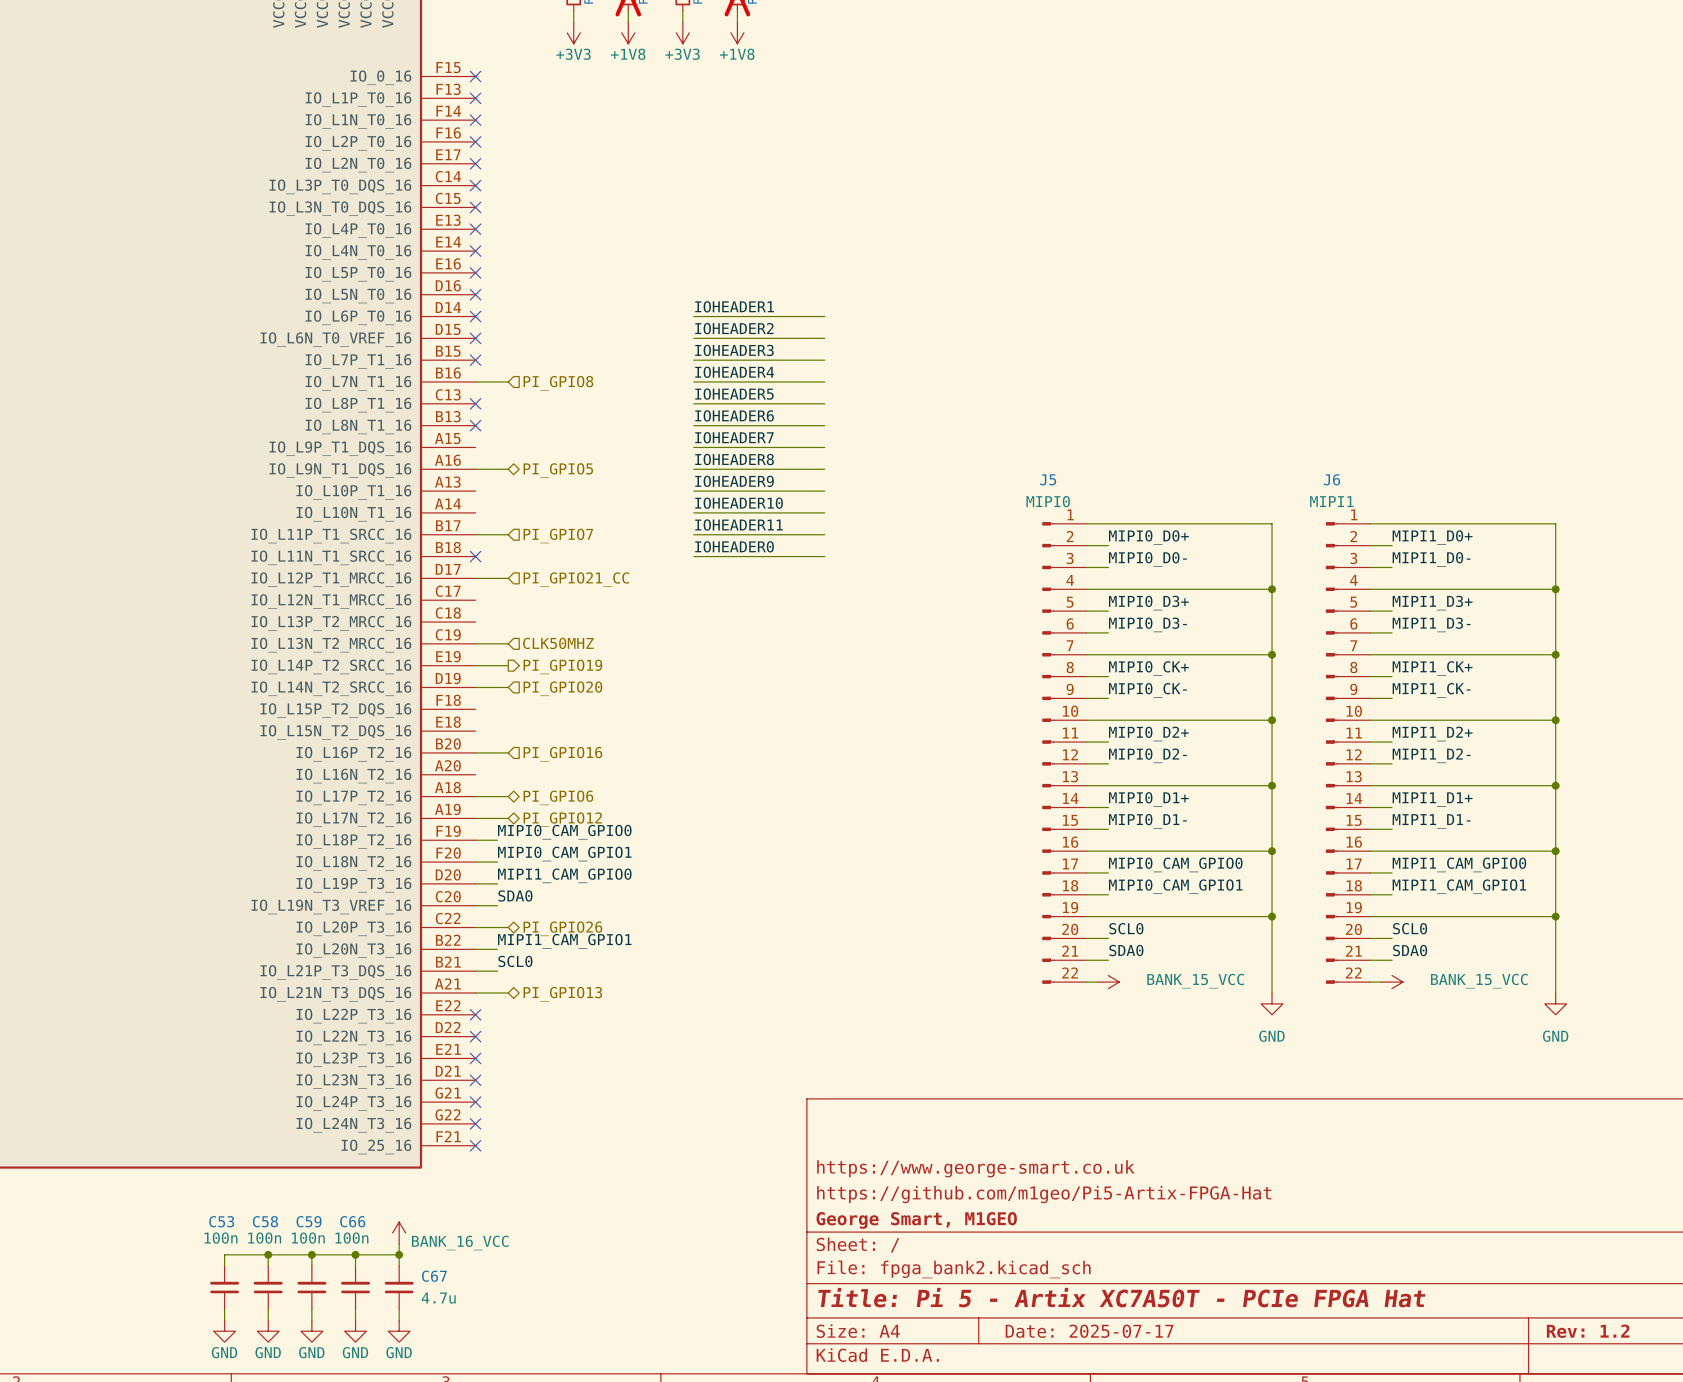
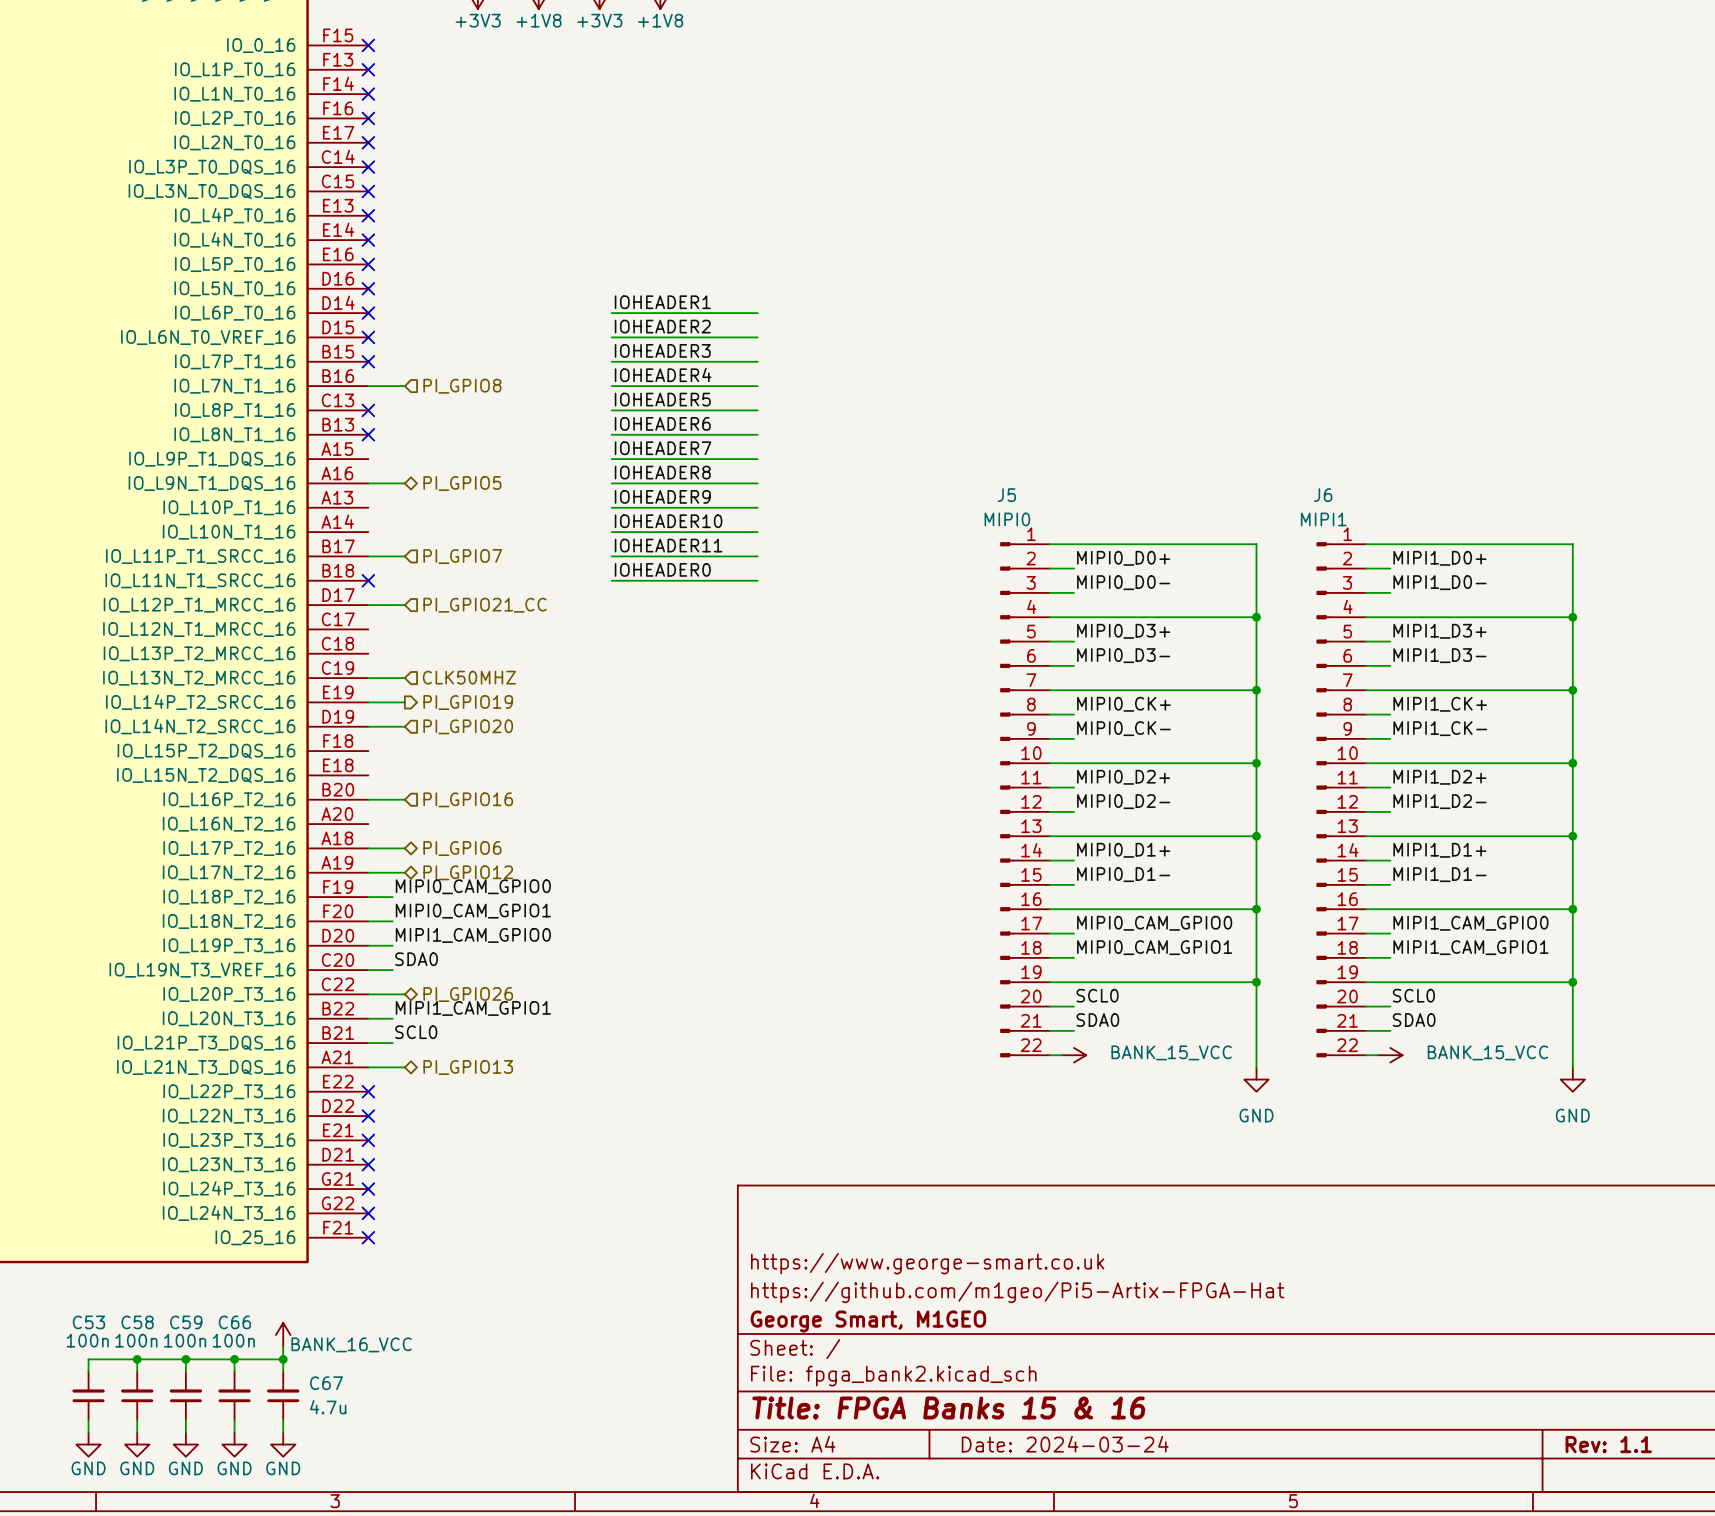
title block: Title: Pi 5 - Artix XC7A50T - PCIe FPGA Hat (1121, 1297) -> Title: FPGA Banks 15 & 16 (948, 1407)
title block: Date: 2025-07-17 (1089, 1331) -> Date: 2024-03-24 (1065, 1444)
title block: Rev: 1.2 (1588, 1331) -> Rev: 1.1 (1608, 1444)

